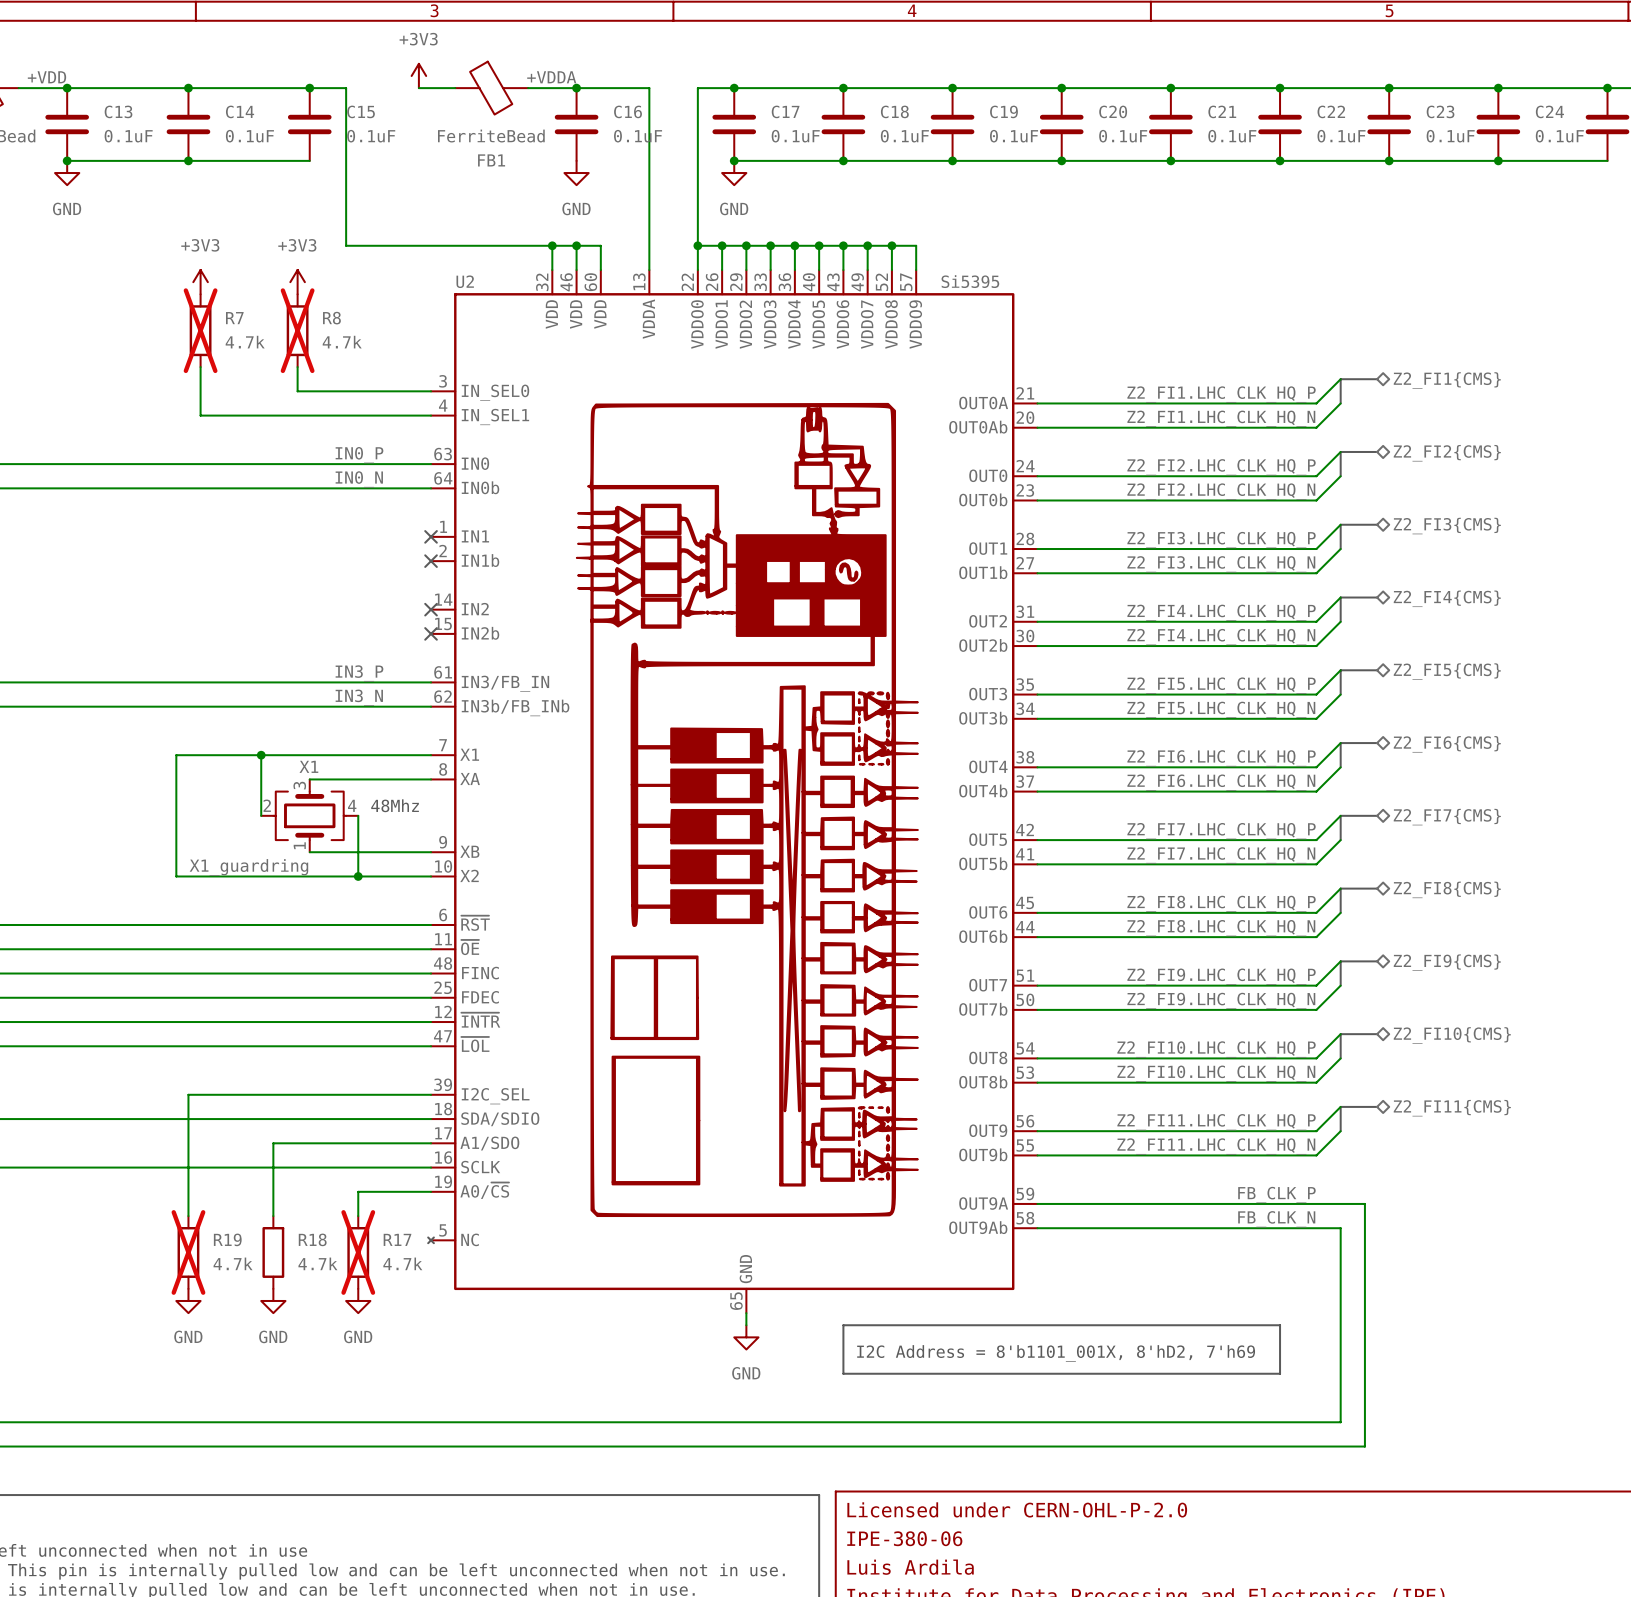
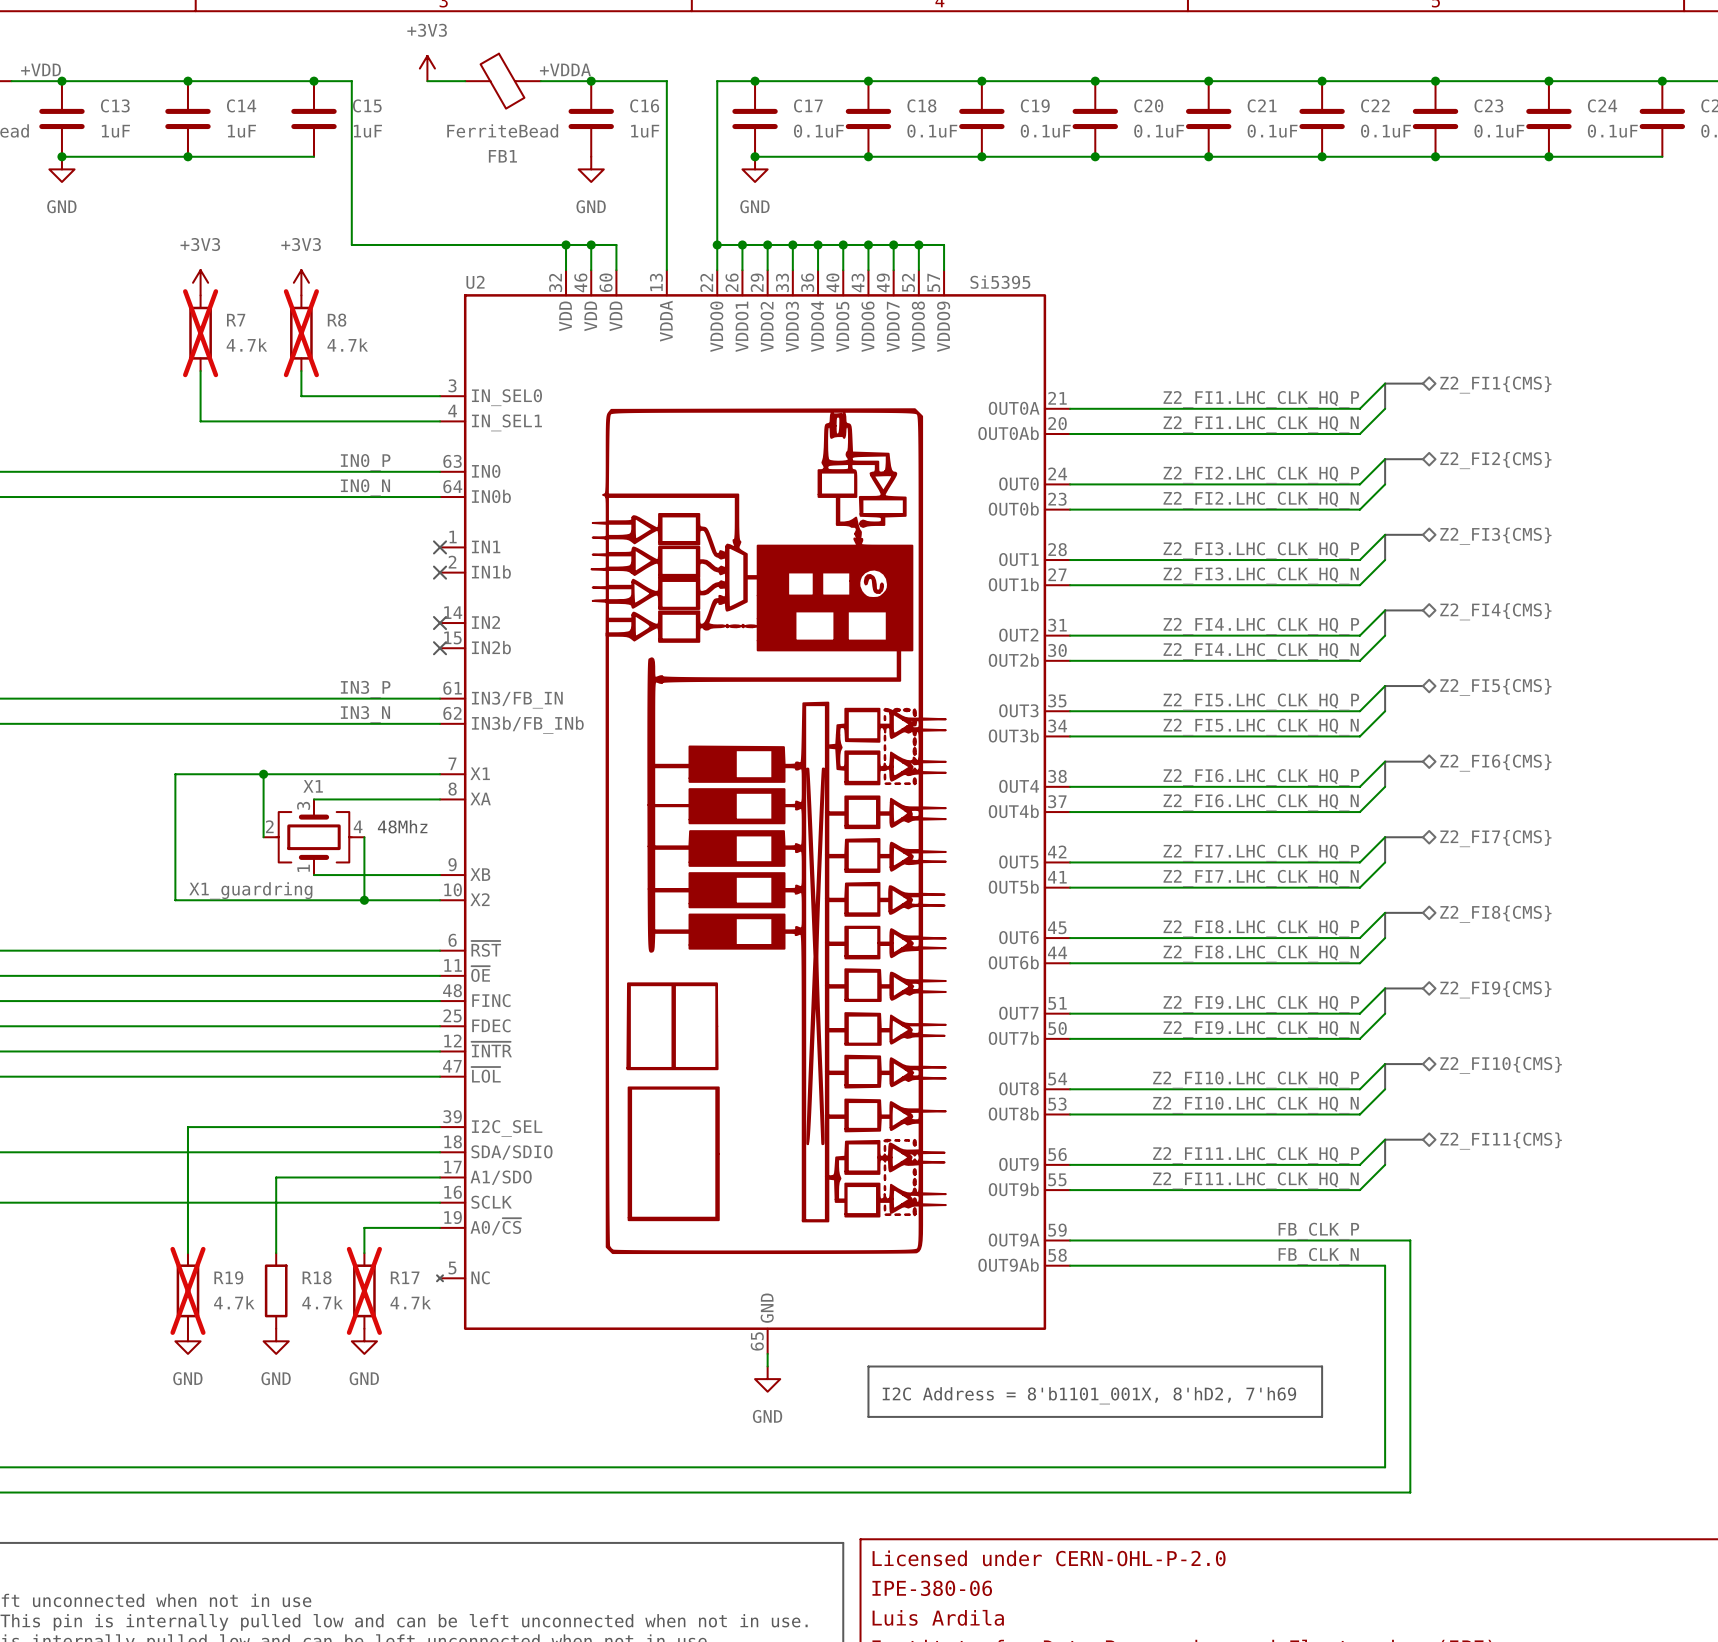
C13 value: 0.1uF (128, 136) -> 1uF (115, 131)
C14 value: 0.1uF (249, 136) -> 1uF (241, 131)
C15 value: 0.1uF (371, 136) -> 1uF (367, 131)
C16 value: 0.1uF (638, 136) -> 1uF (645, 131)

